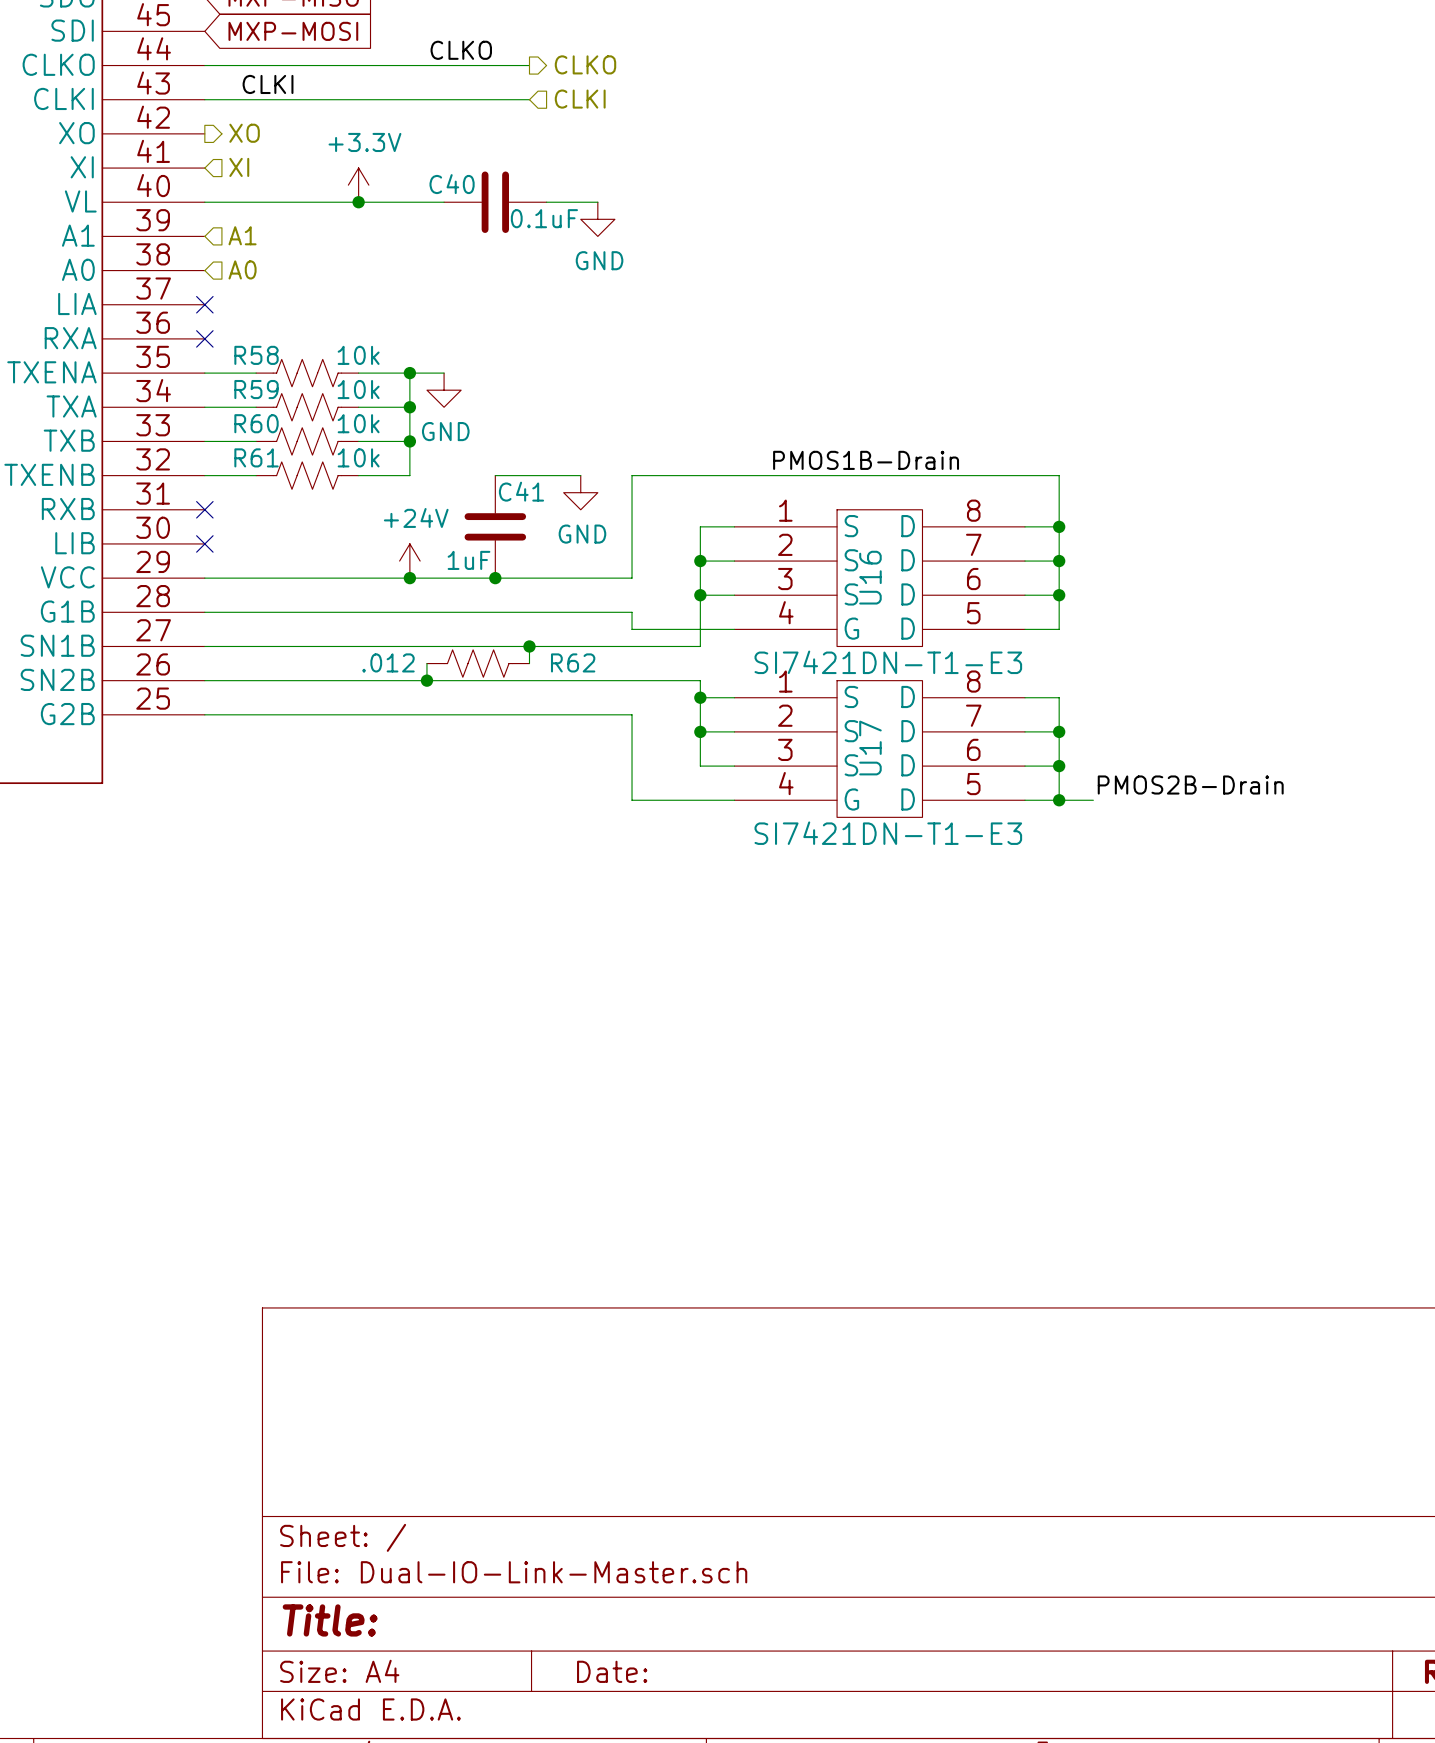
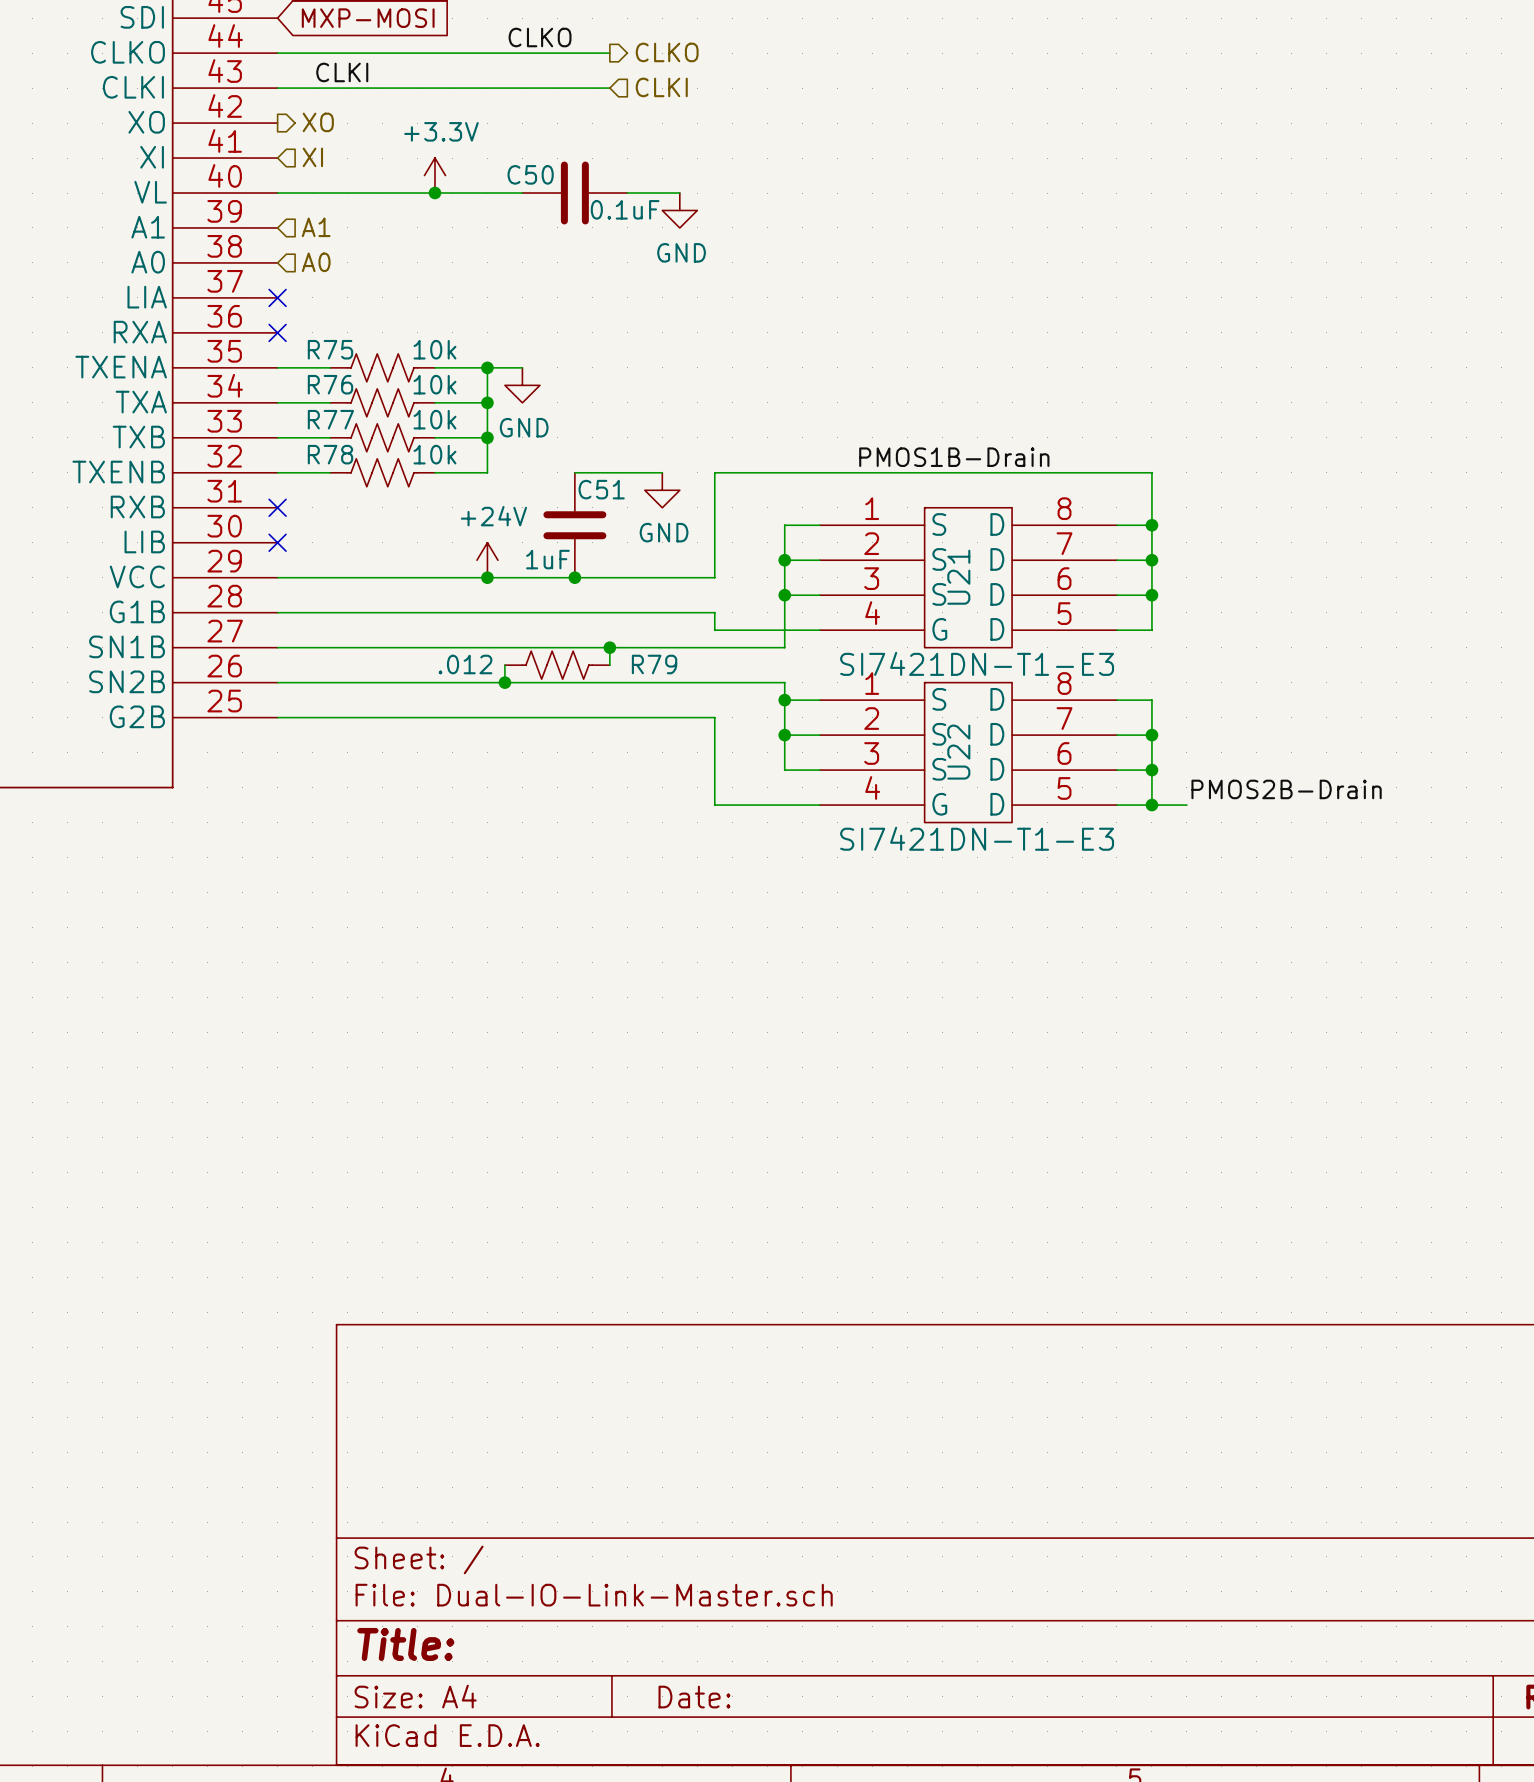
C40 name: C40 (452, 184) -> C50 (530, 174)
R58 name: R58 (256, 355) -> R75 (330, 349)
R59 name: R59 (256, 389) -> R76 (330, 384)
R60 name: R60 (256, 423) -> R77 (330, 419)
R61 name: R61 (256, 457) -> R78 (330, 454)
C41 name: C41 (521, 491) -> C51 (601, 489)
U16 name: U16 (870, 577) -> U21 (958, 577)
R62 name: R62 (573, 662) -> R79 (654, 664)
U17 name: U17 (870, 748) -> U22 (958, 752)

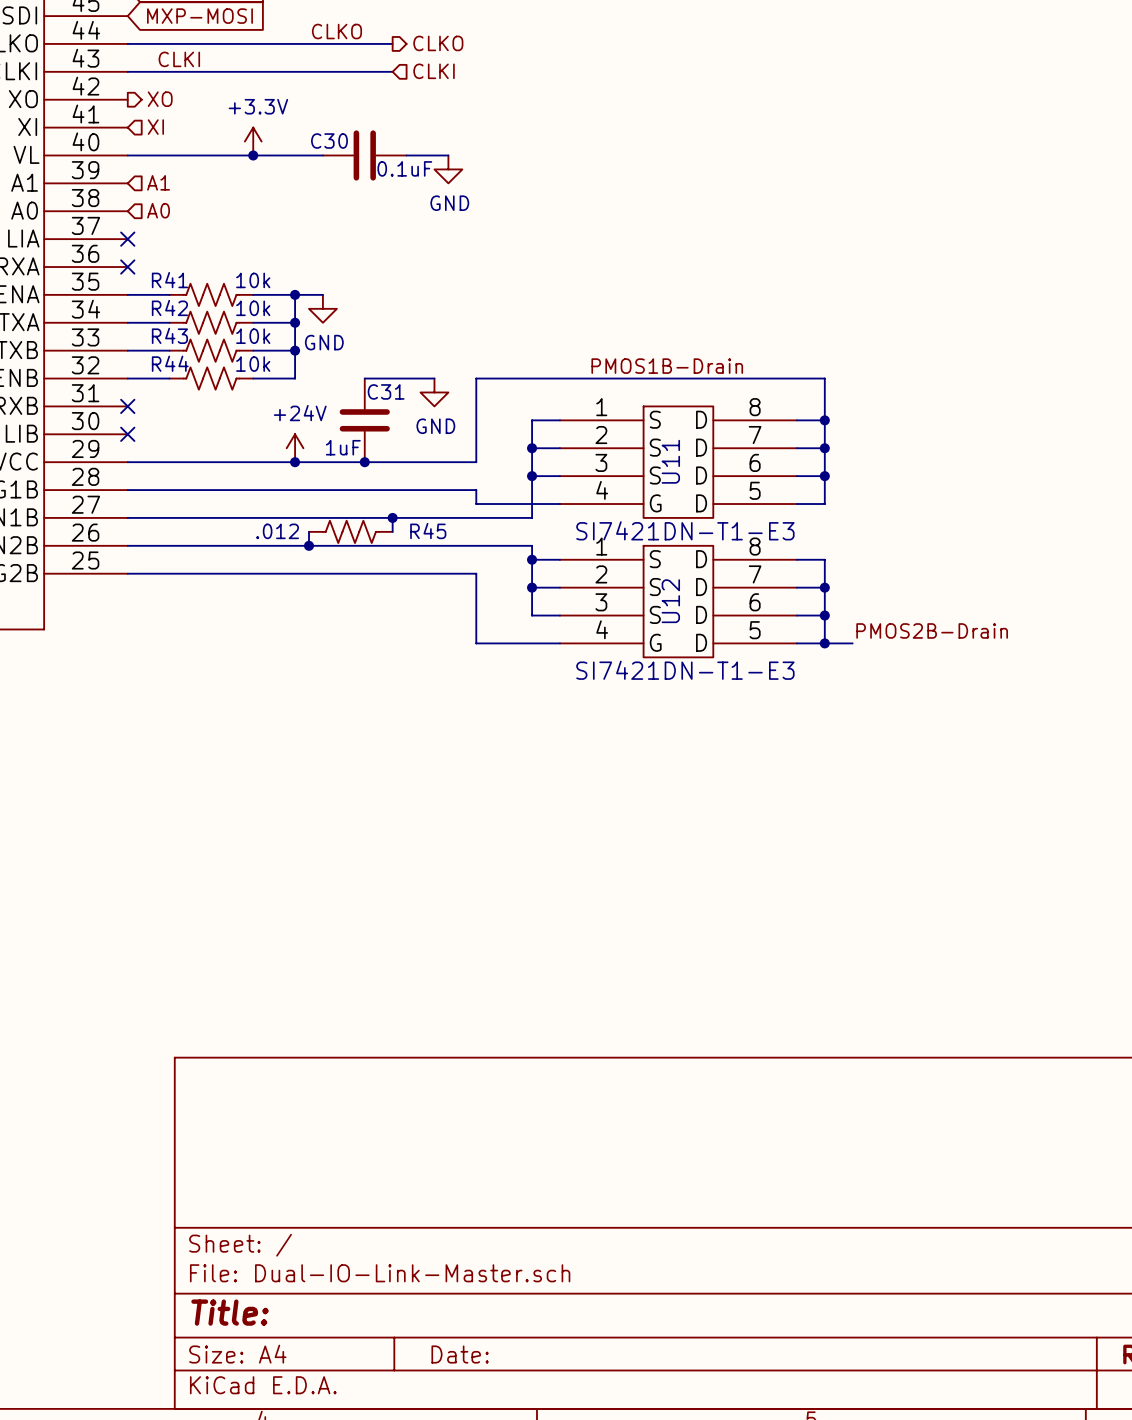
C50 name: C50 (530, 174) -> C30 (329, 141)
R75 name: R75 (330, 349) -> R41 (169, 280)
R76 name: R76 (330, 384) -> R42 (169, 307)
R77 name: R77 (330, 419) -> R43 (169, 335)
R78 name: R78 (330, 454) -> R44 (170, 363)
C51 name: C51 (601, 489) -> C31 (386, 391)
U21 name: U21 (958, 577) -> U11 (670, 461)
R79 name: R79 (654, 664) -> R45 (428, 531)
U22 name: U22 (958, 752) -> U12 (670, 601)

